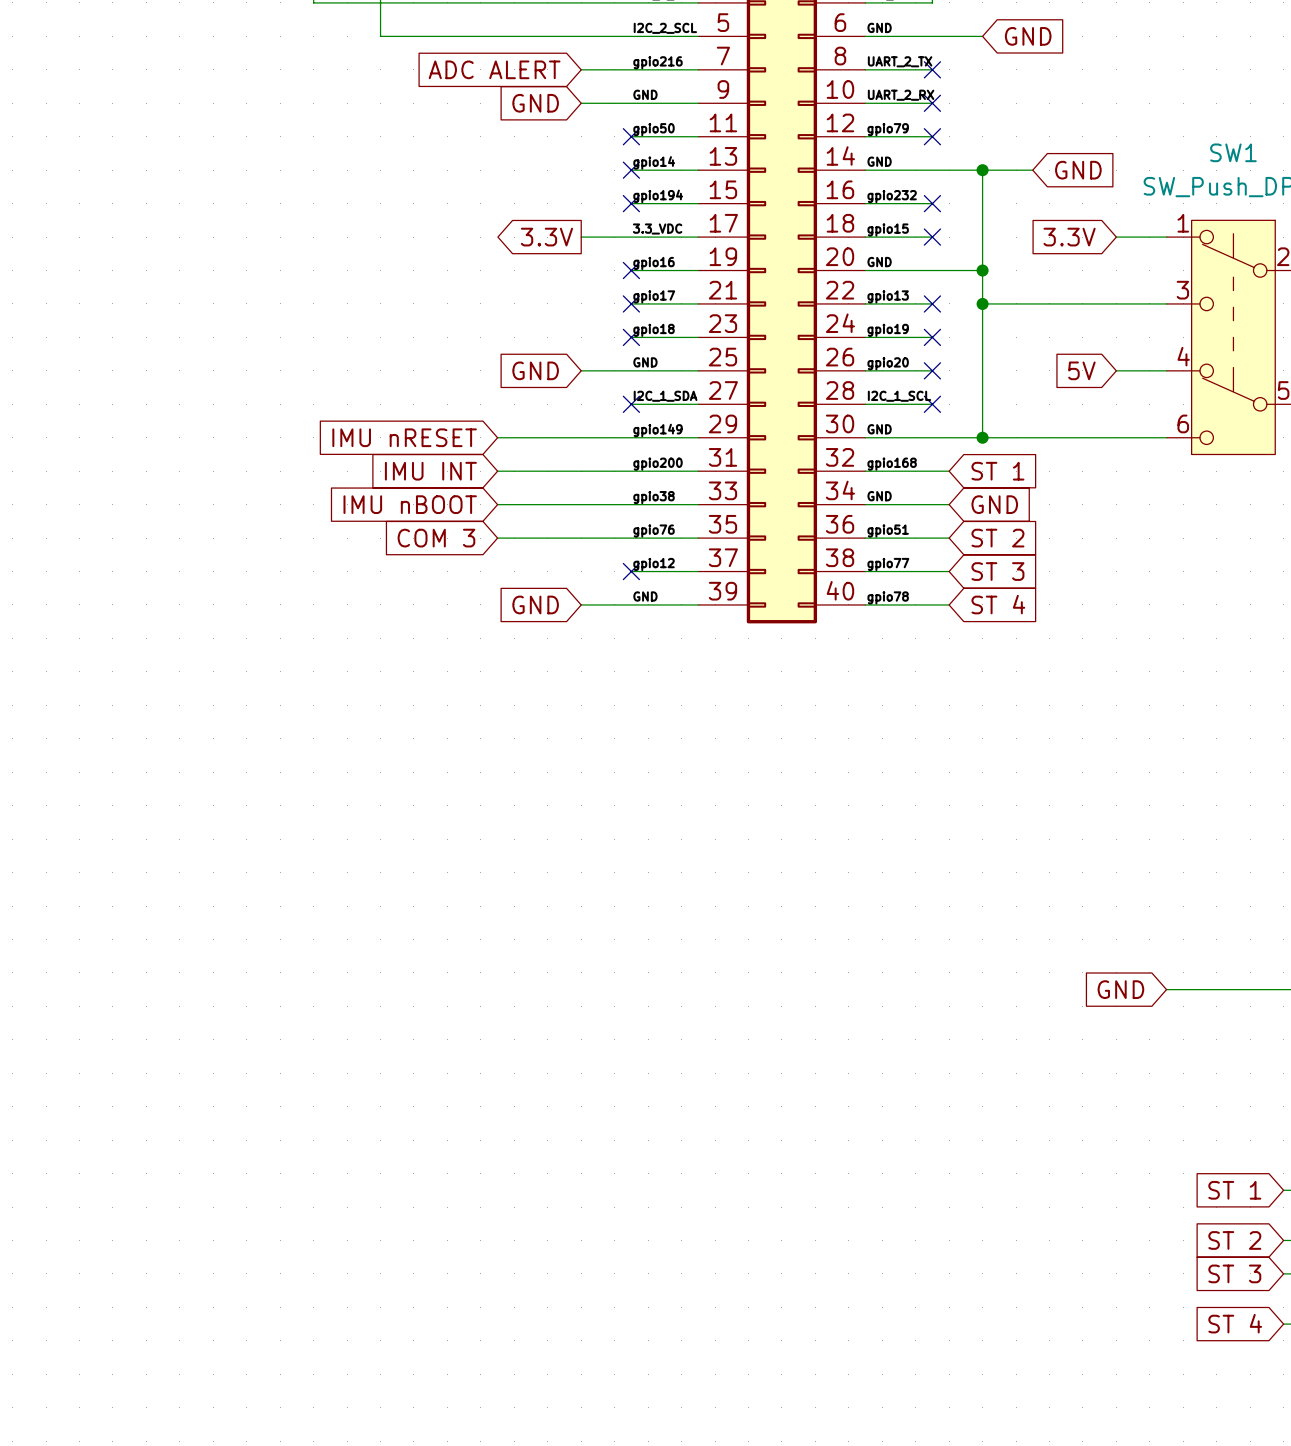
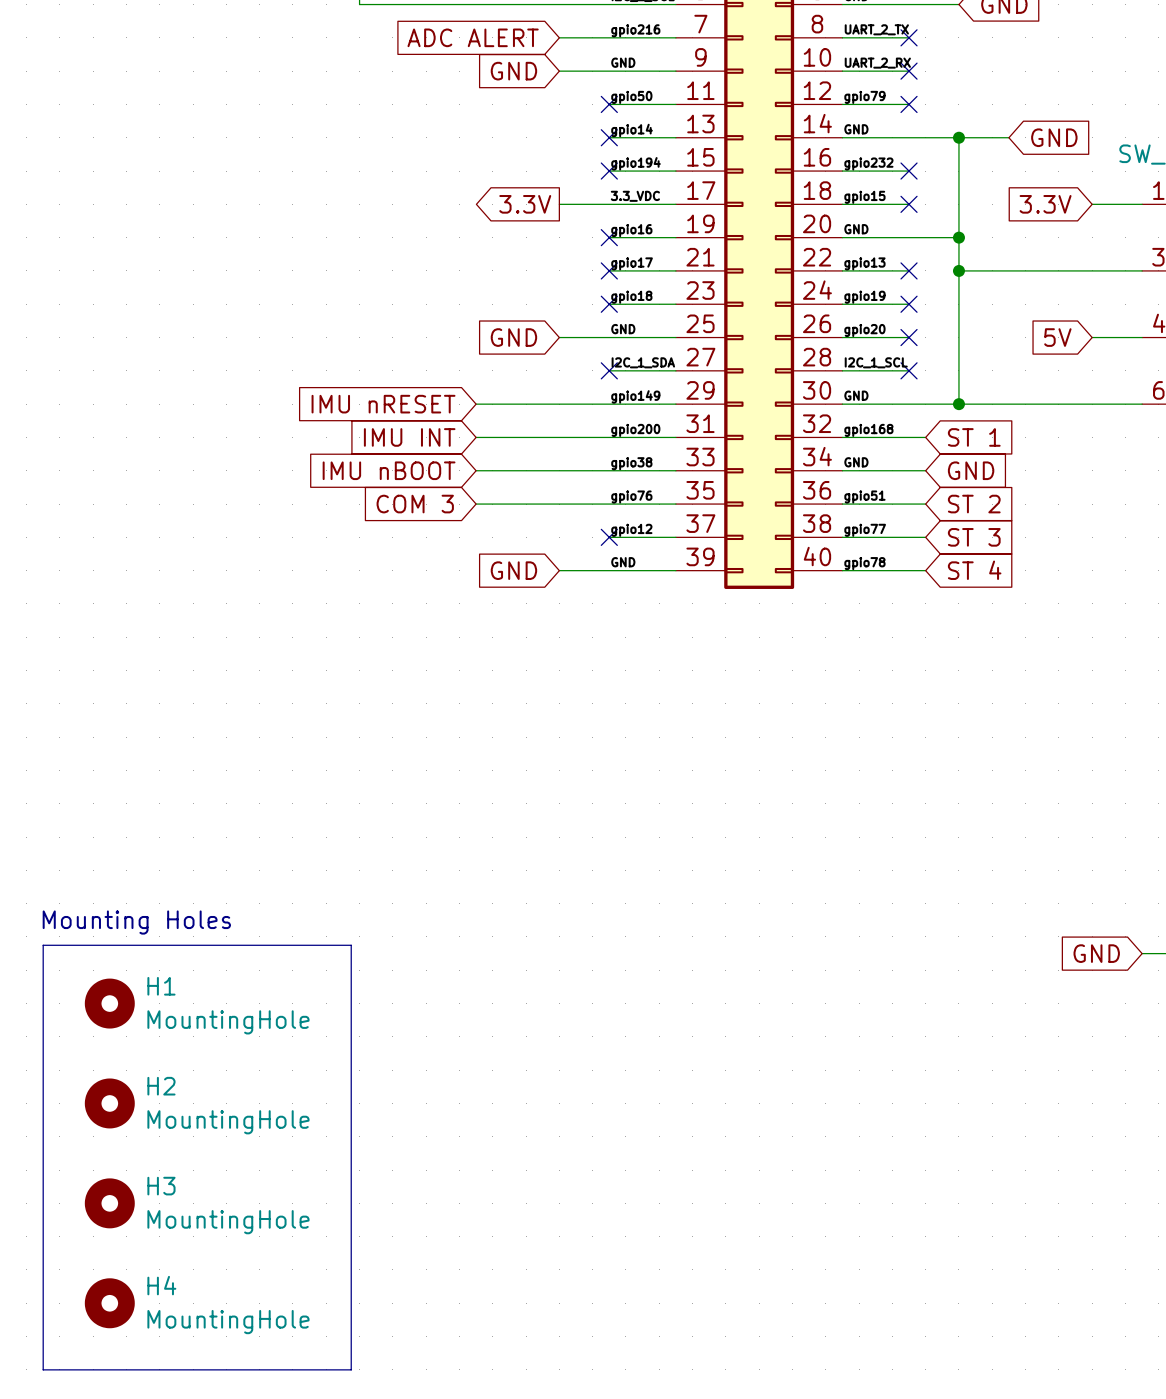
text: none -> Mounting Holes (136, 922)
line: none -> (43, 945) (351, 945) (351, 1369) (43, 1369) (43, 945)
H1: none -> MountingHole (109, 1003)
H2: none -> MountingHole (109, 1103)
H3: none -> MountingHole (109, 1203)
H4: none -> MountingHole (109, 1303)

